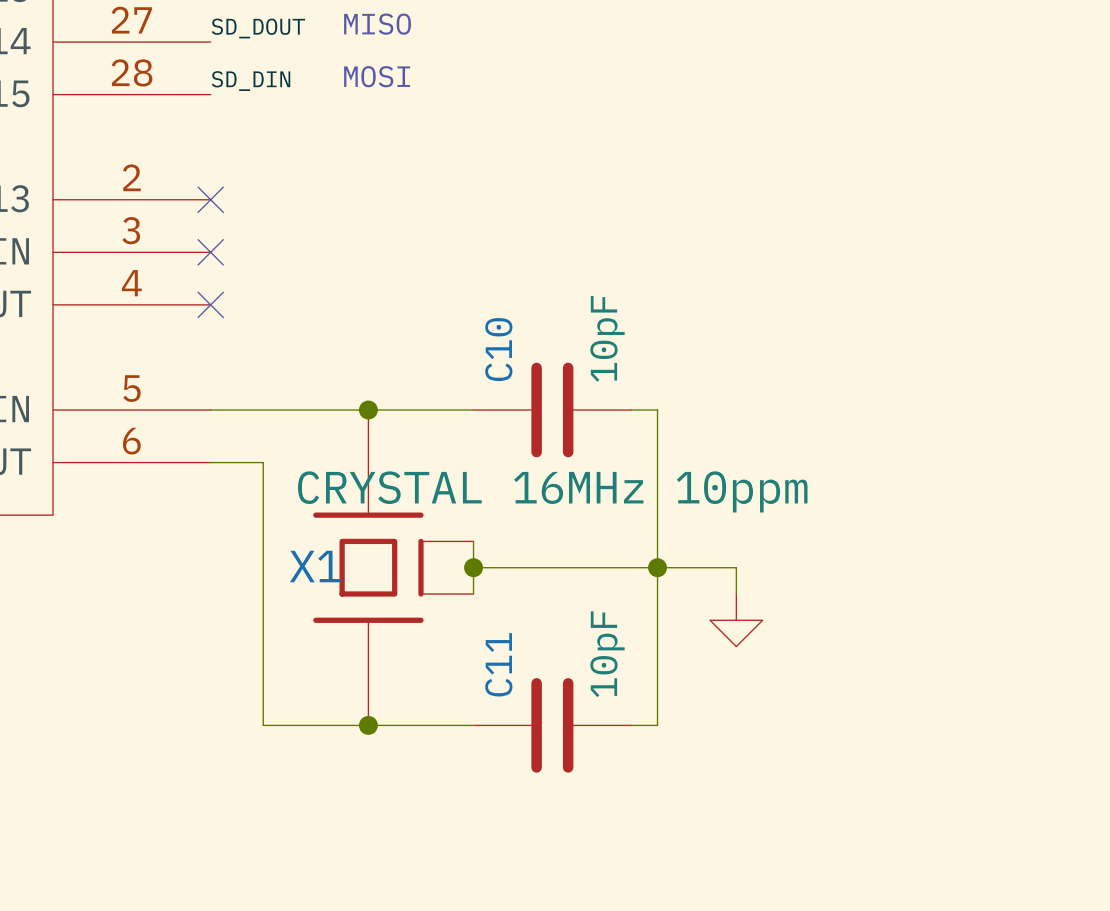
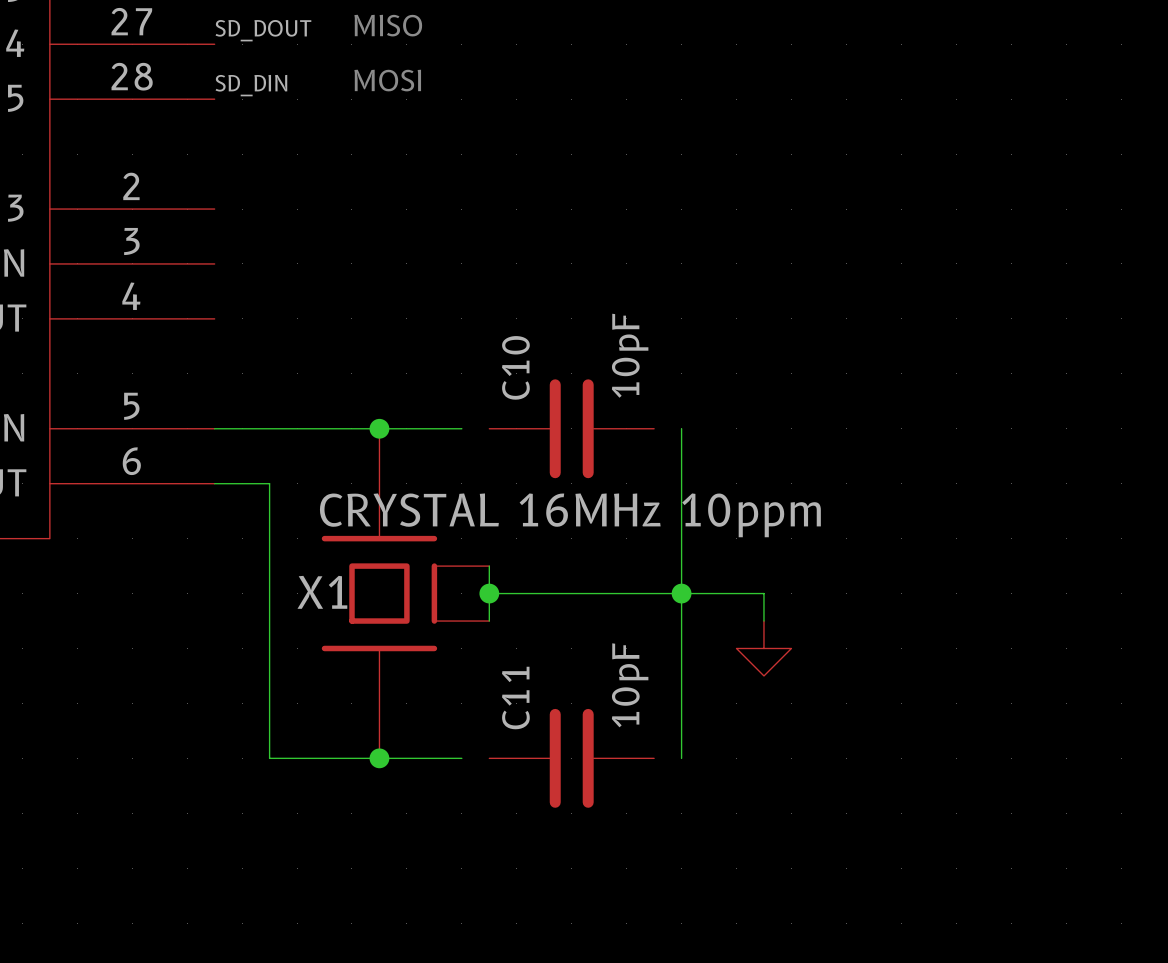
no-connect mark: (210, 199) -> none
no-connect mark: (210, 252) -> none
no-connect mark: (210, 304) -> none
wire: (447, 410) (473, 410) -> none
wire: (631, 410) (657, 410) -> none
wire: (447, 725) (473, 725) -> none
wire: (631, 725) (657, 725) -> none

